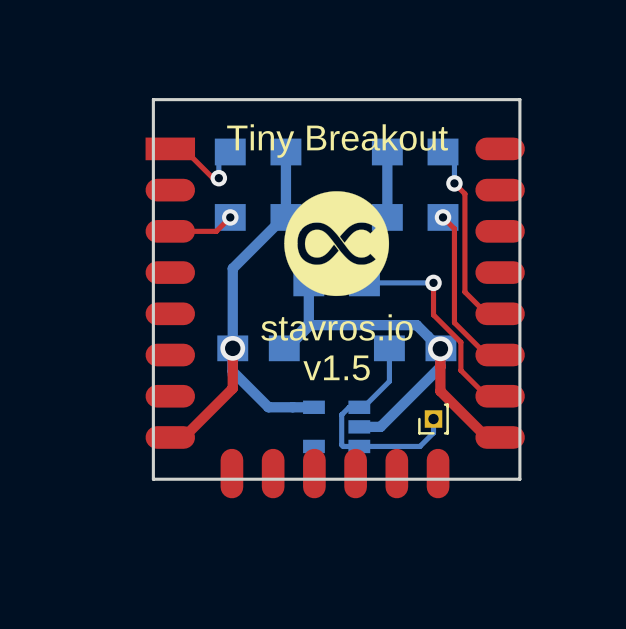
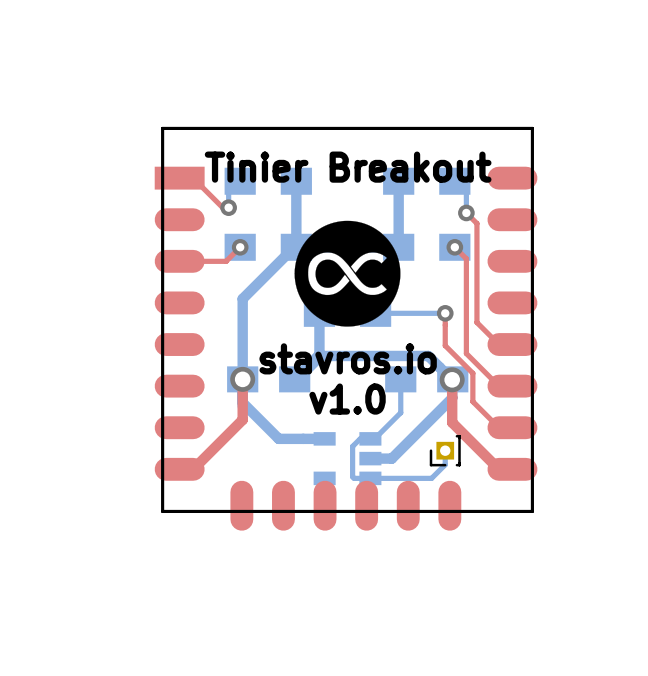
text: Tiny Breakout (337, 141) -> Tinier Breakout (348, 167)
text: v1.5 (336, 368) -> v1.0 (347, 399)

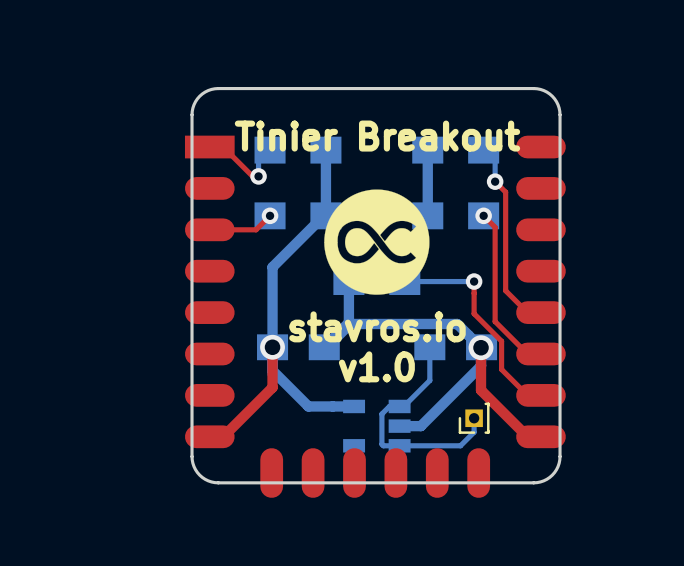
board edge: none -> (218, 88) (208, 90) (199, 96) (194, 104) (192, 114) (192, 456) (197, 472) (205, 479) (218, 482) (533, 482)
board edge: none -> (218, 88) (533, 88) (543, 90) (554, 98) (560, 114) (560, 456) (558, 466) (552, 475) (543, 480) (533, 482)
board edge: (162, 128) (162, 511) (532, 511) (532, 128) (162, 128) -> none

